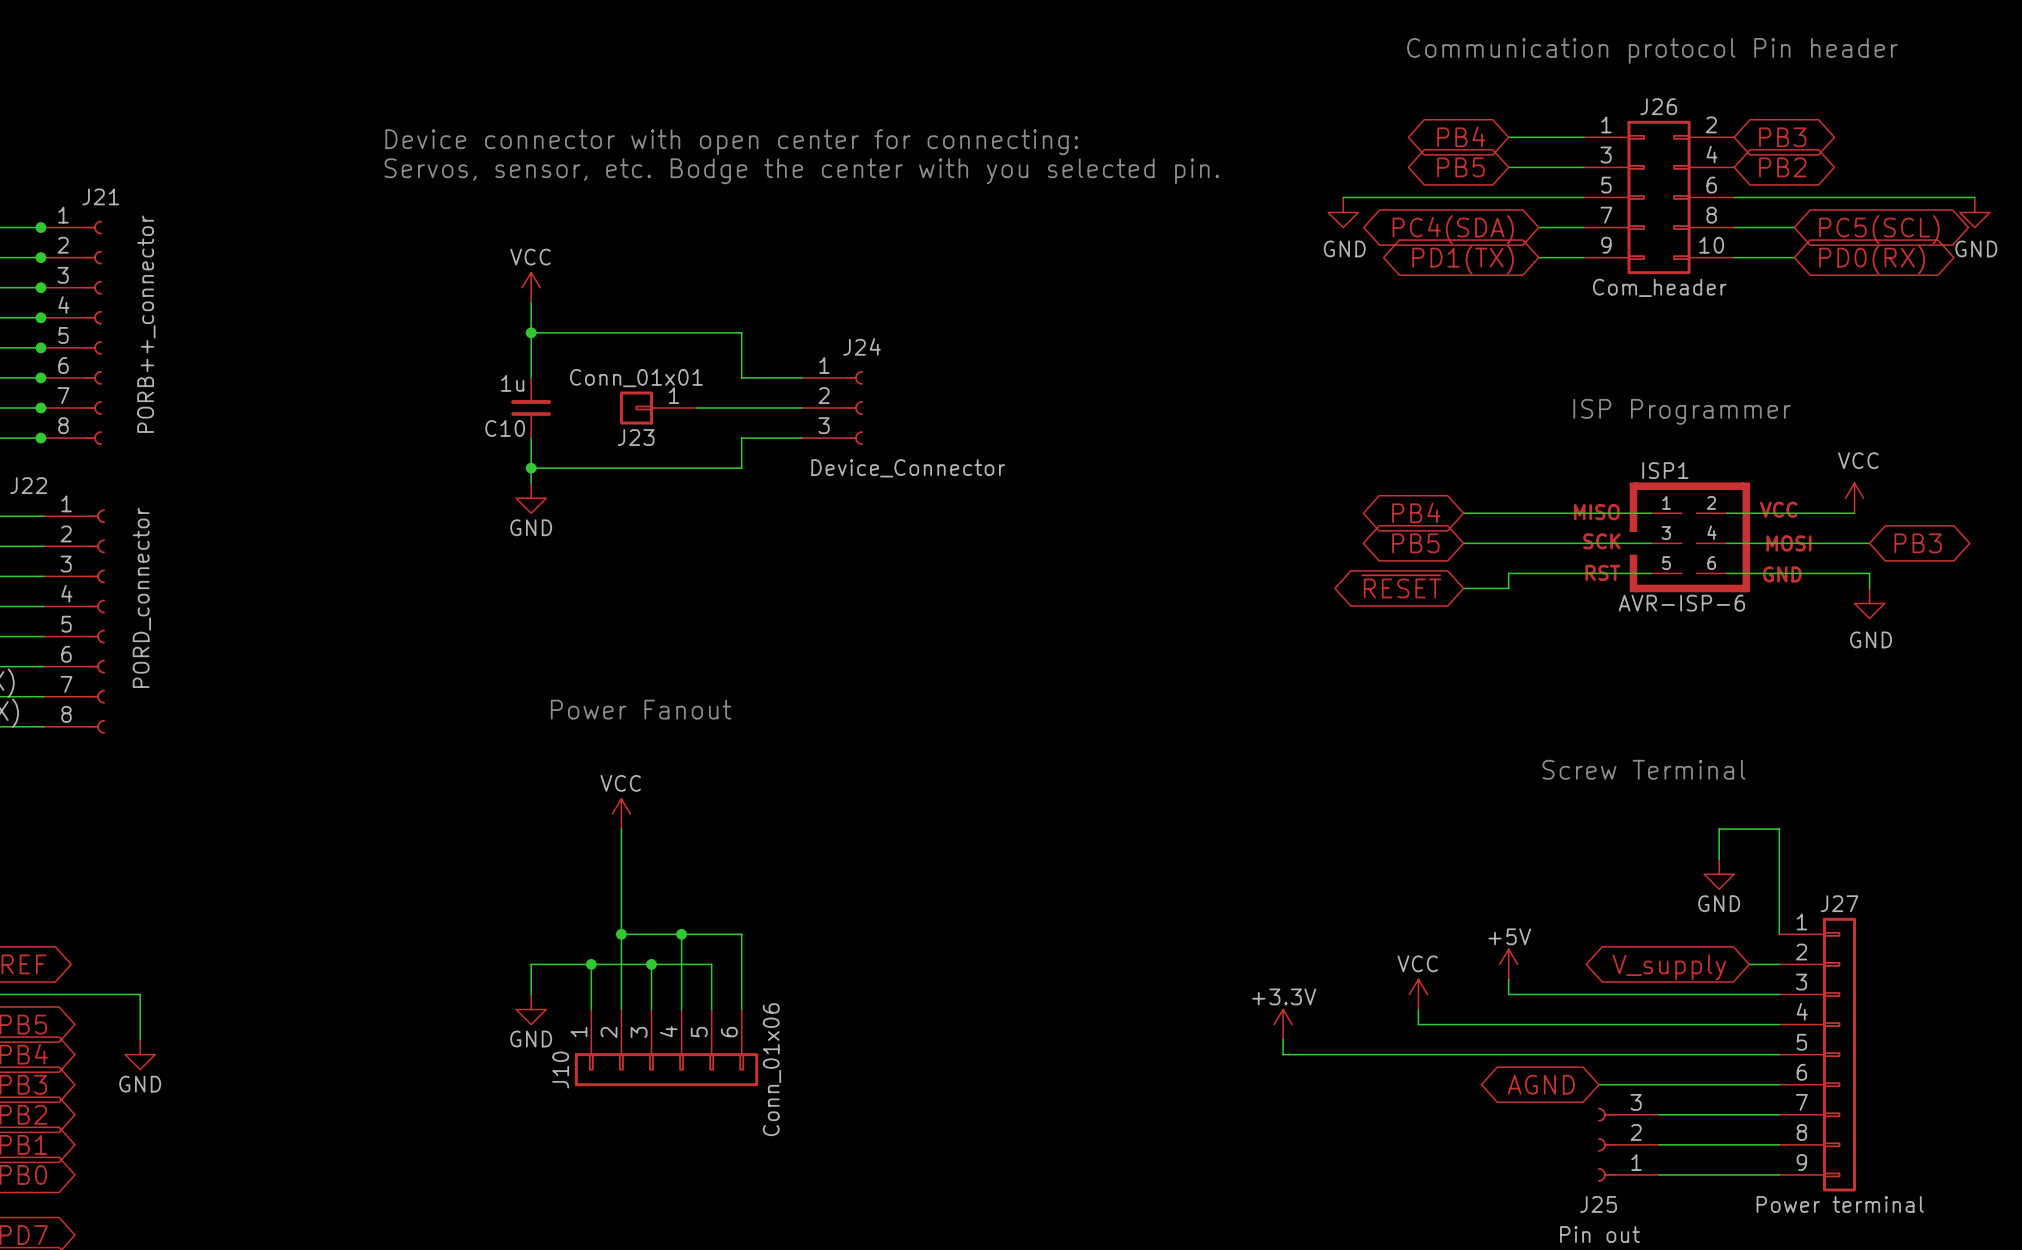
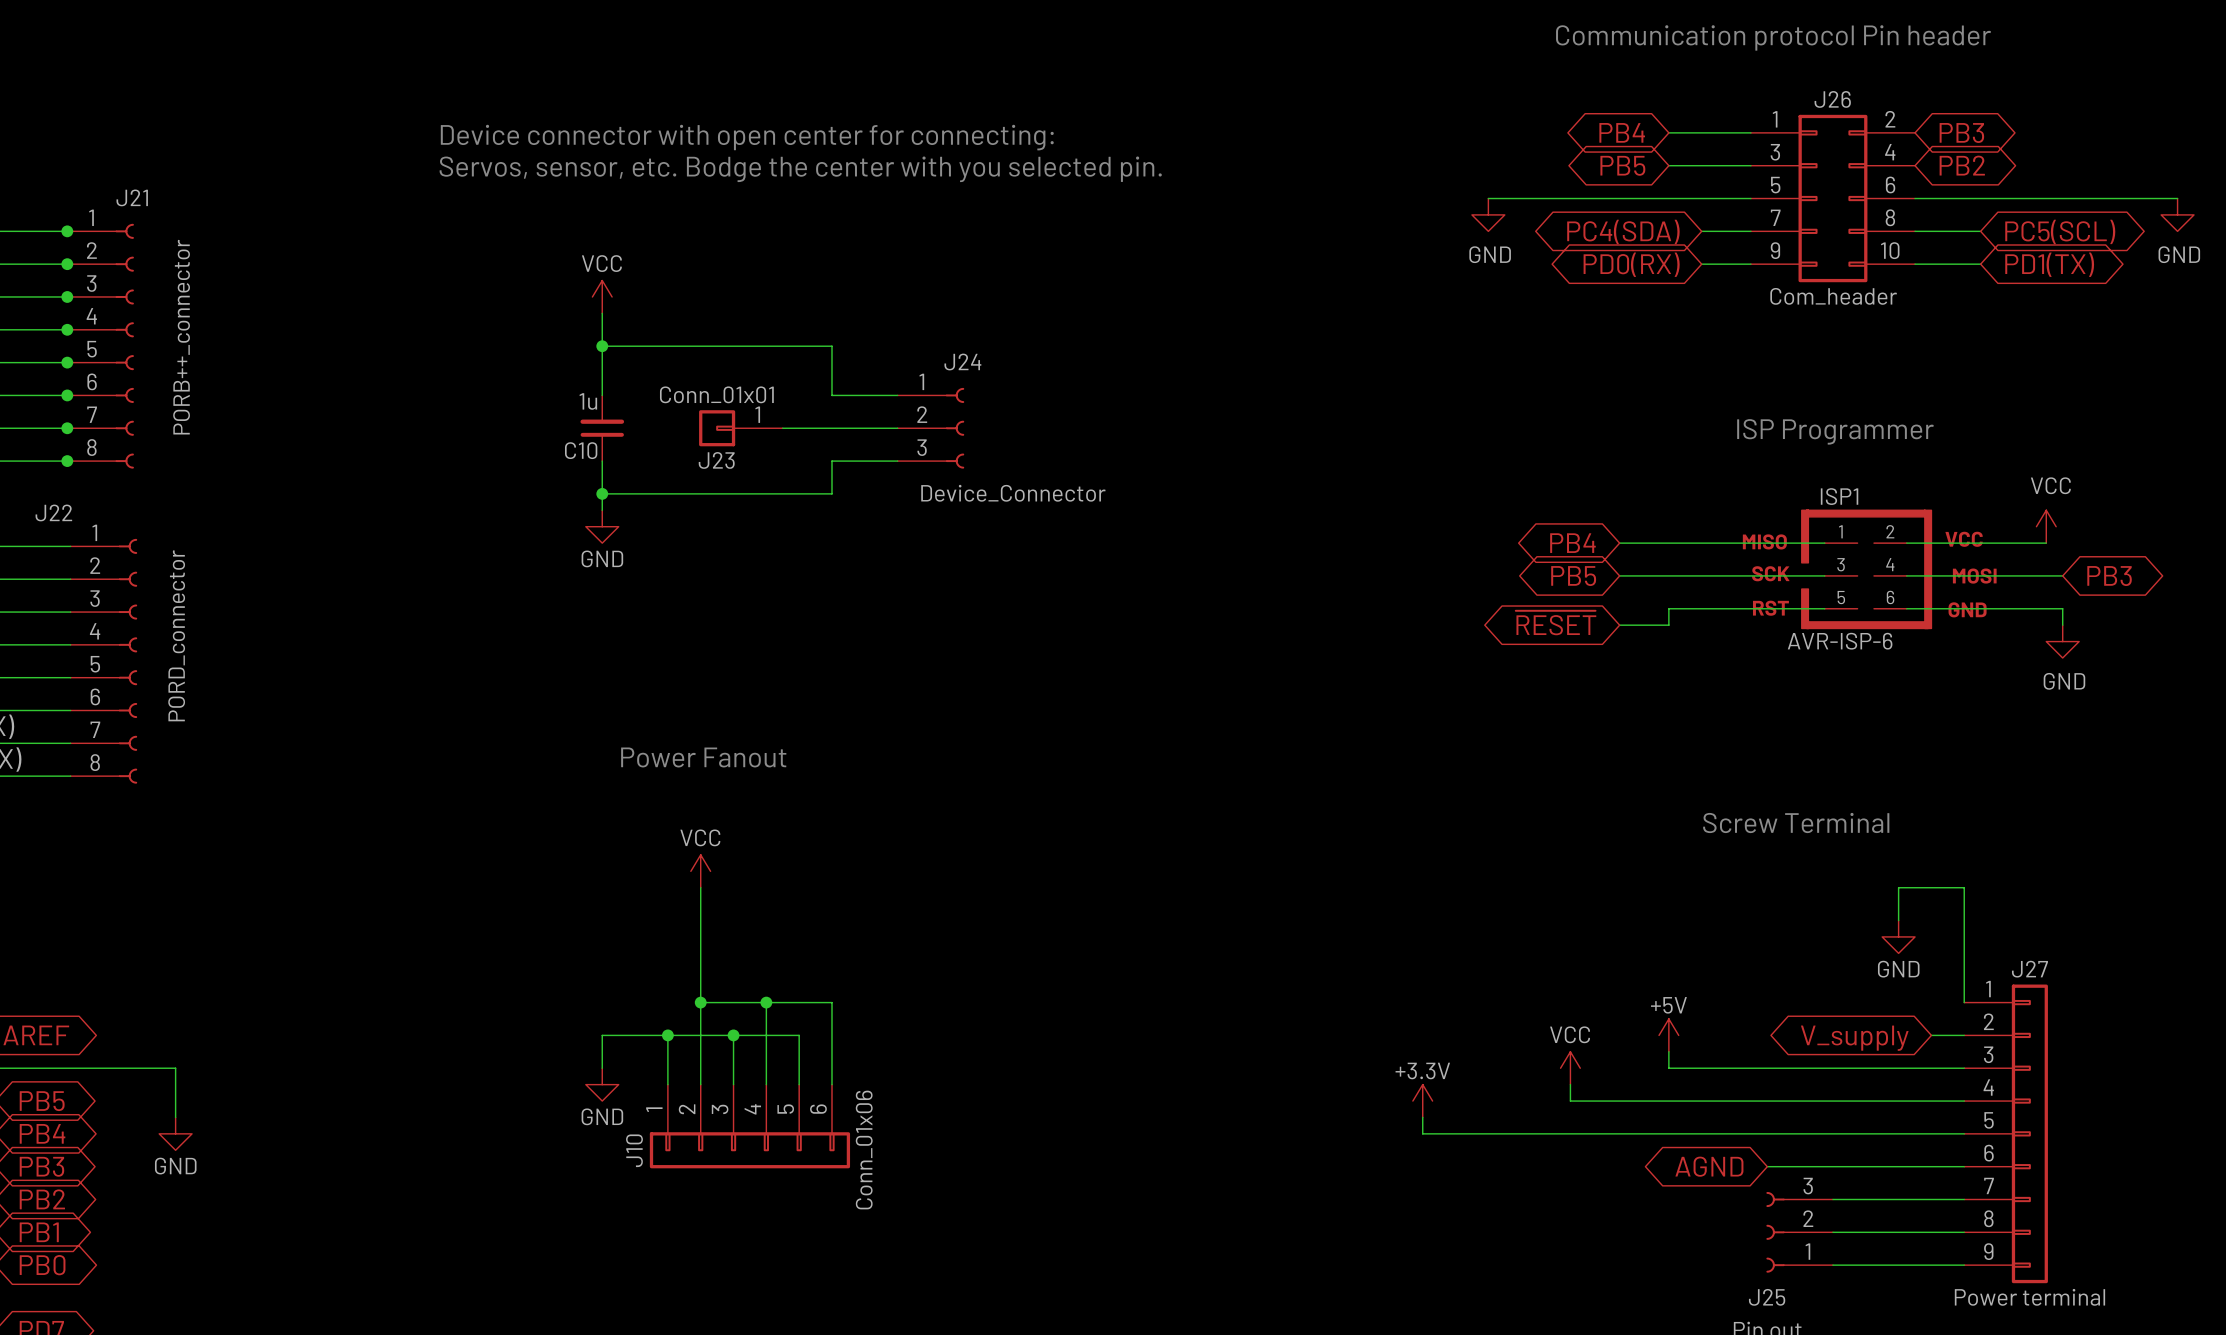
global label: PD1(TX) (1463, 259) -> PD0(RX) (1631, 264)
global label: PD0(RX) (1872, 259) -> PD1(TX) (2049, 264)

